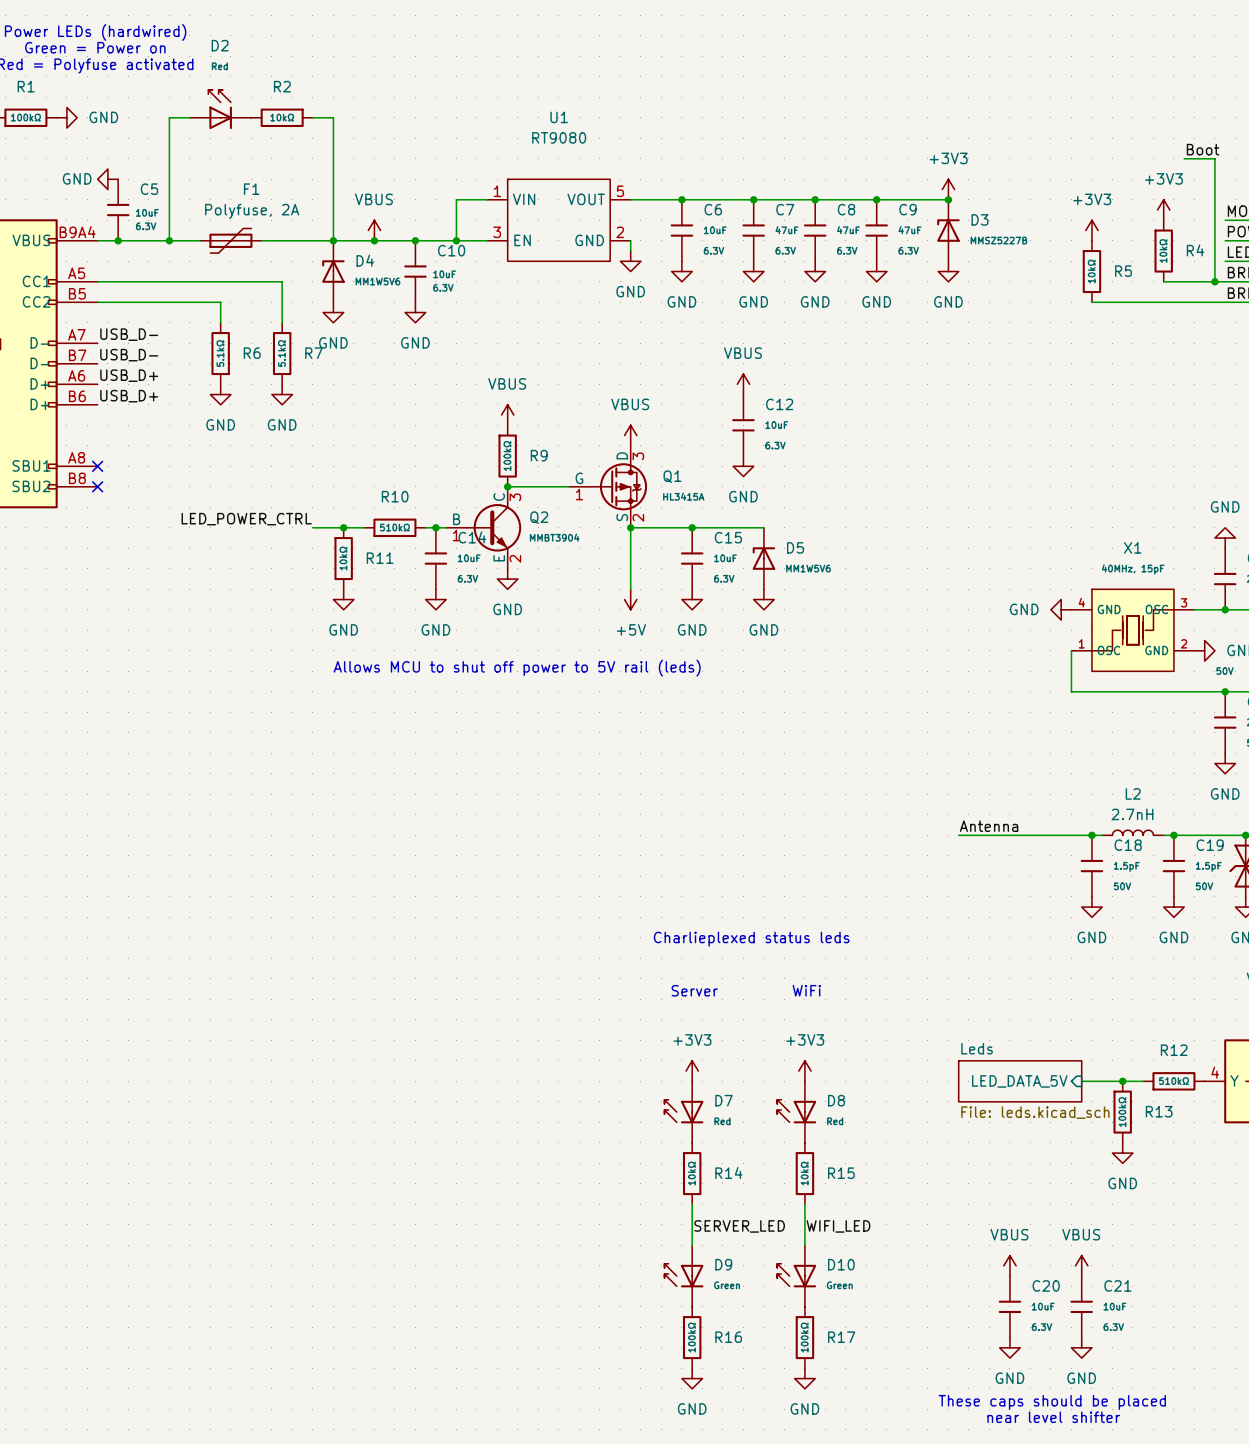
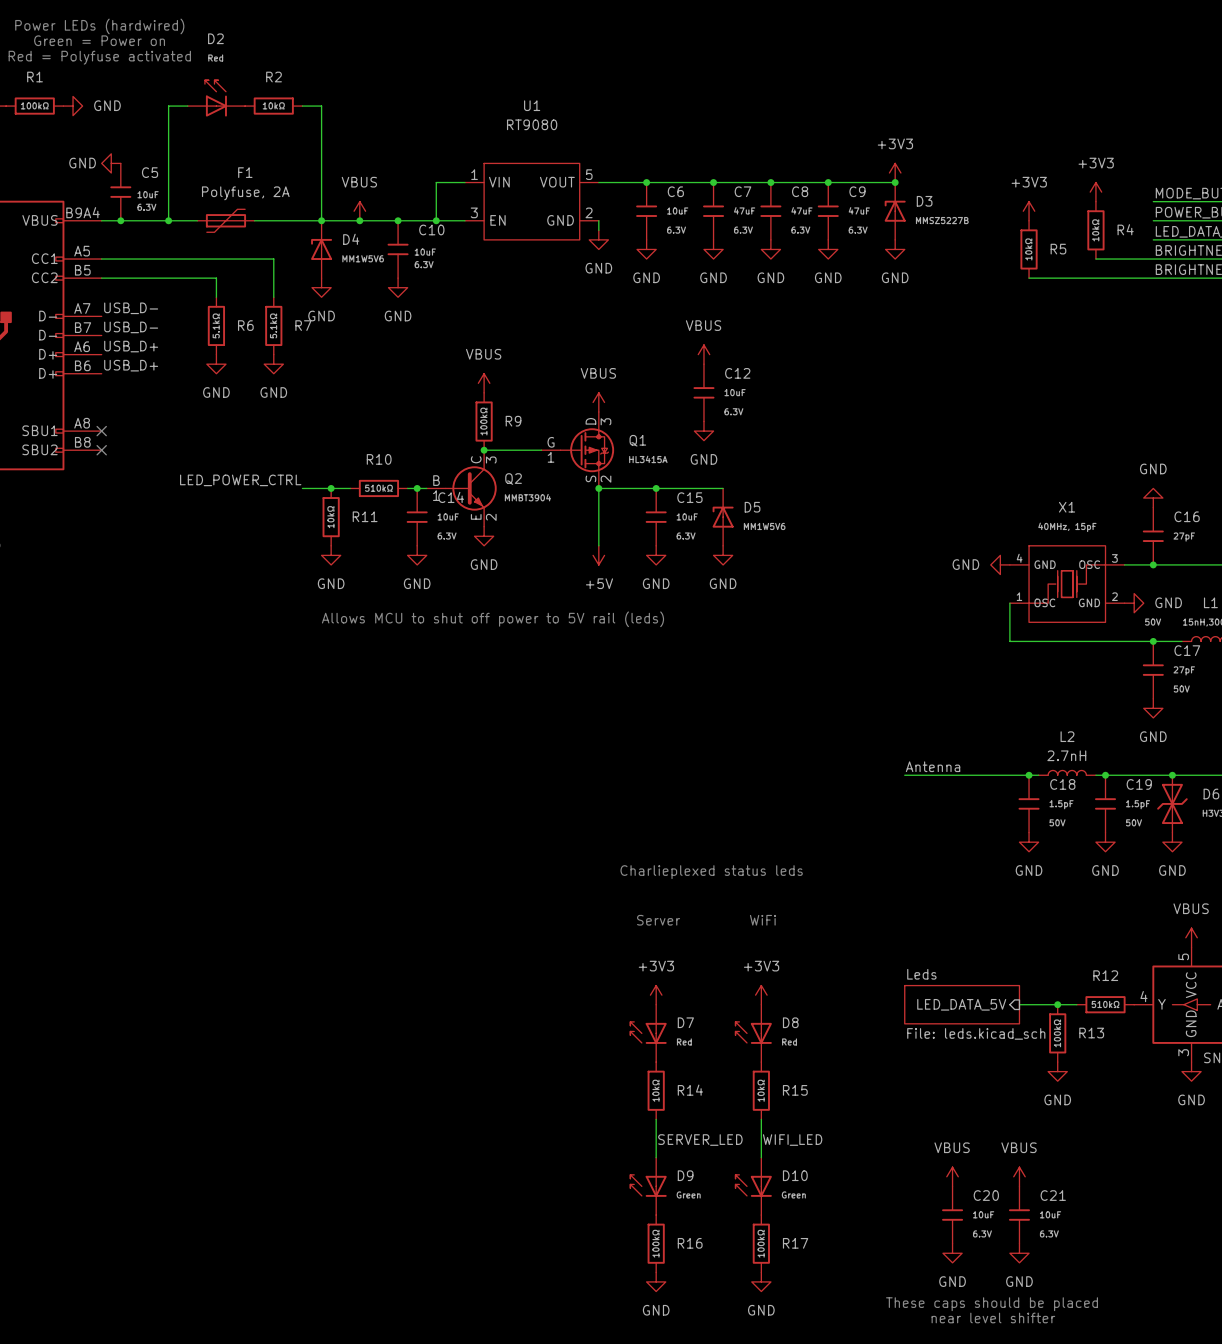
label: Boot (1203, 149) -> none
wire: (1184, 158) (1214, 158) (1214, 281) -> none
junction: (1214, 281) -> none

